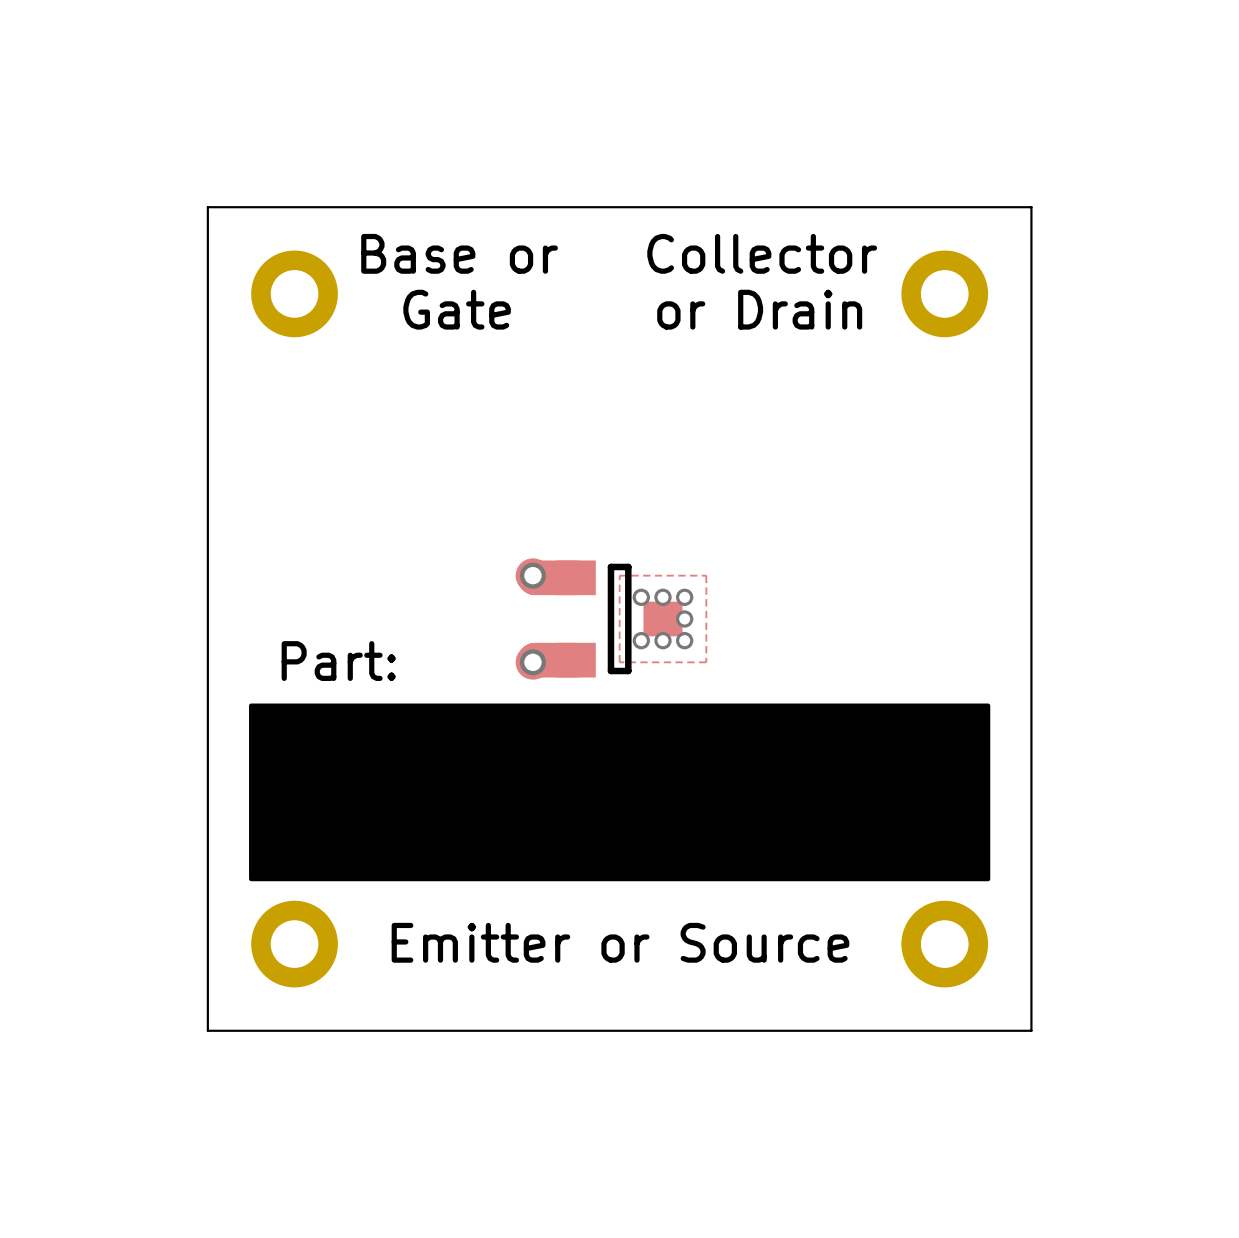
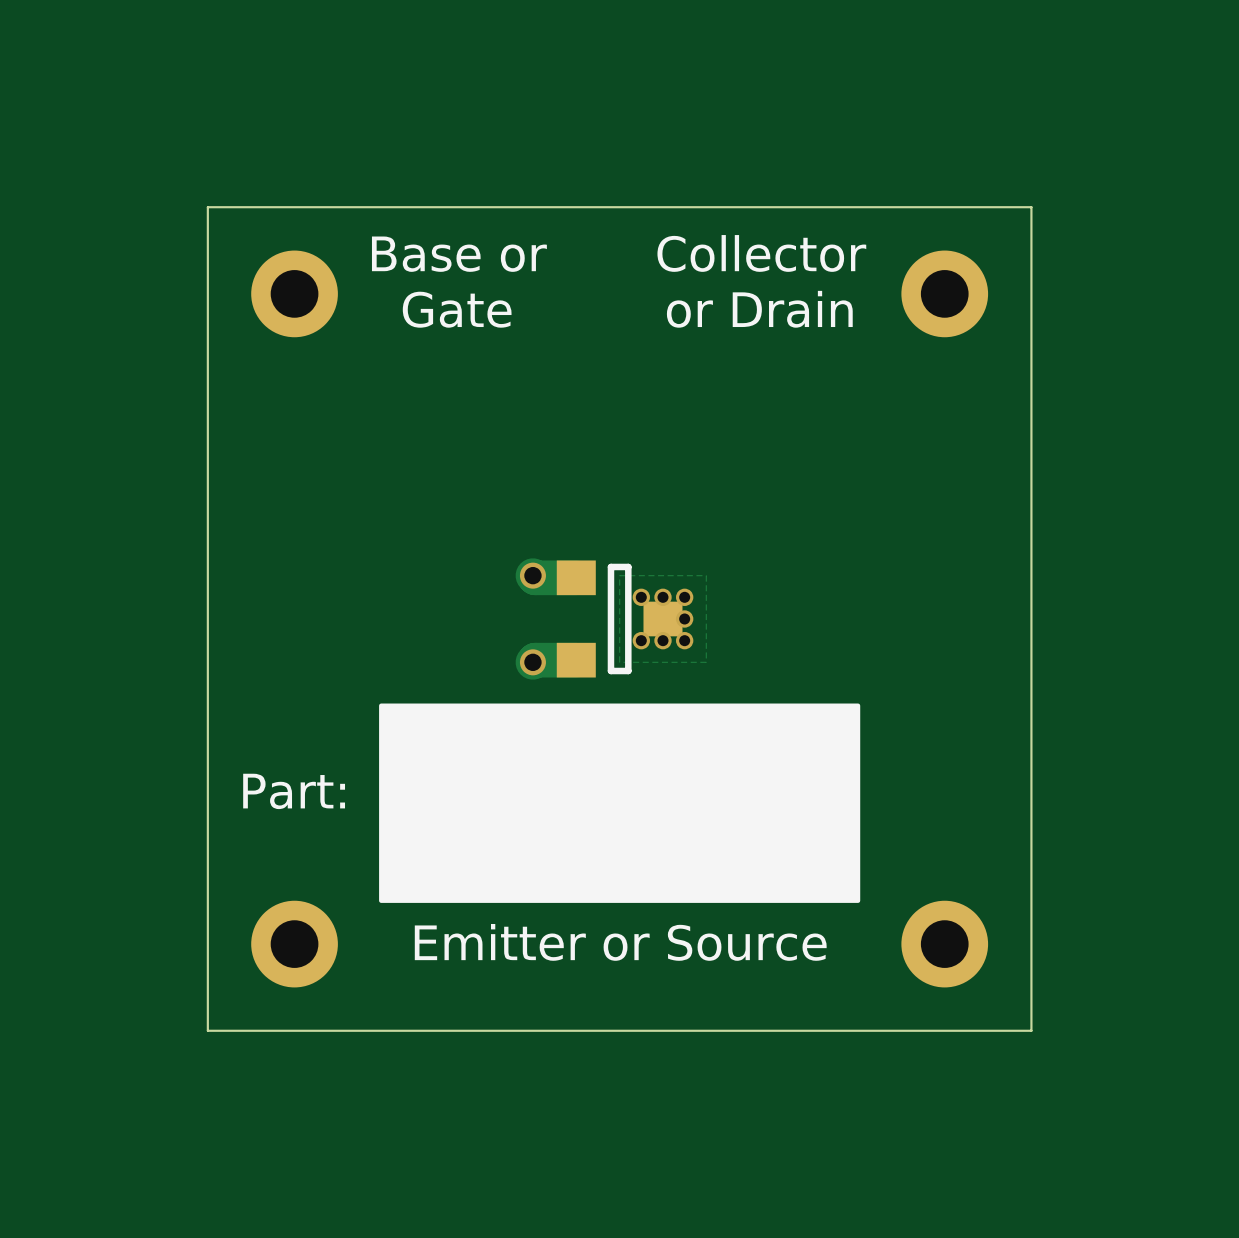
text position: Part: (338, 661) -> Part: (294, 791)
drawing shape: [249, 703, 991, 882] -> [379, 703, 861, 903]

